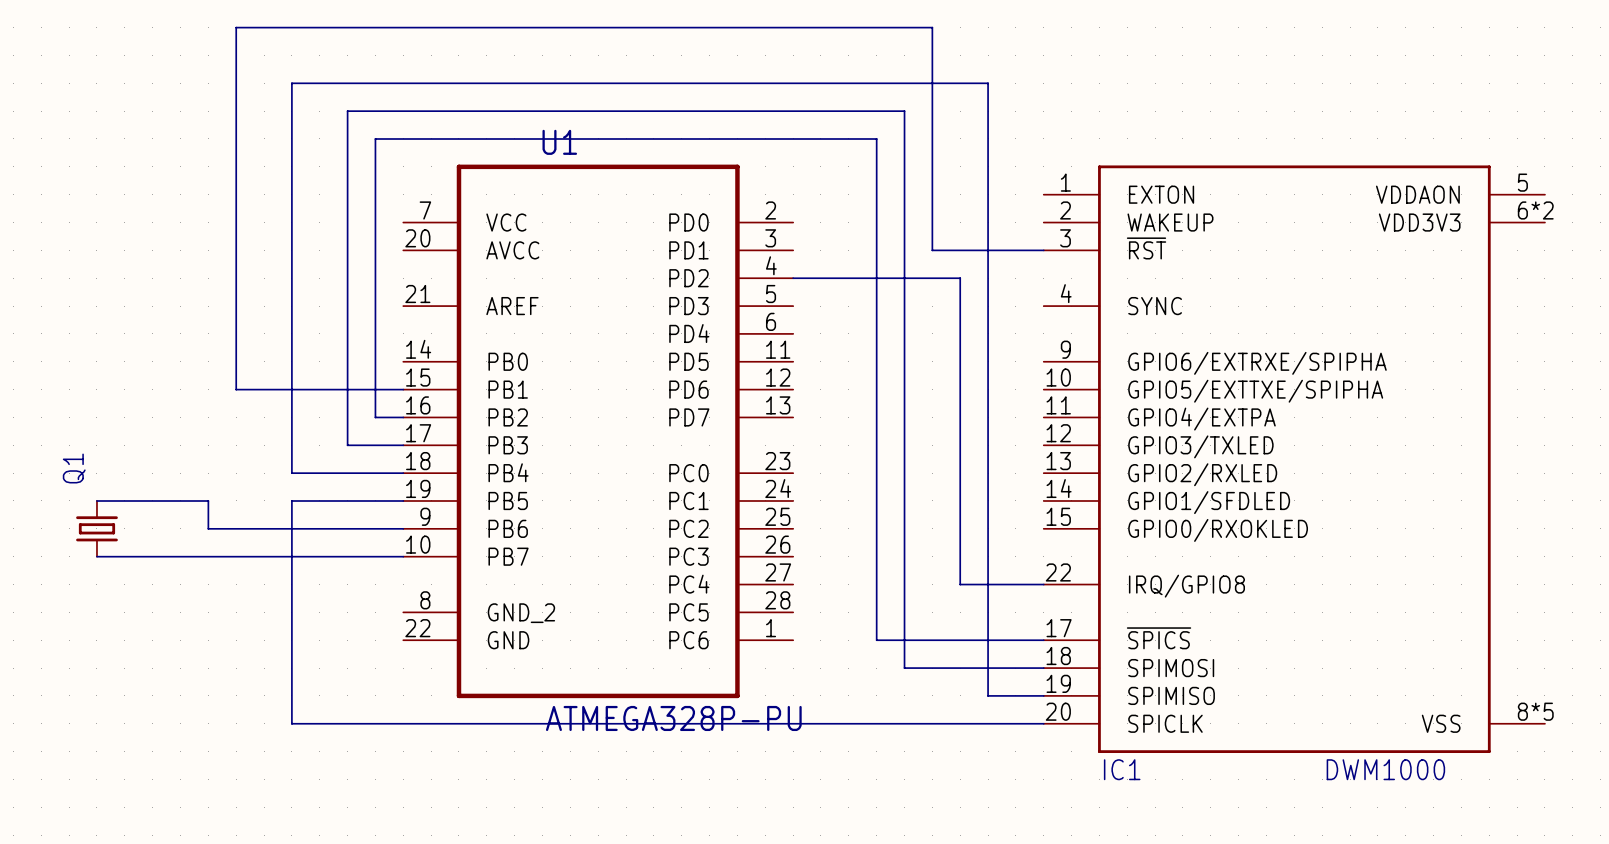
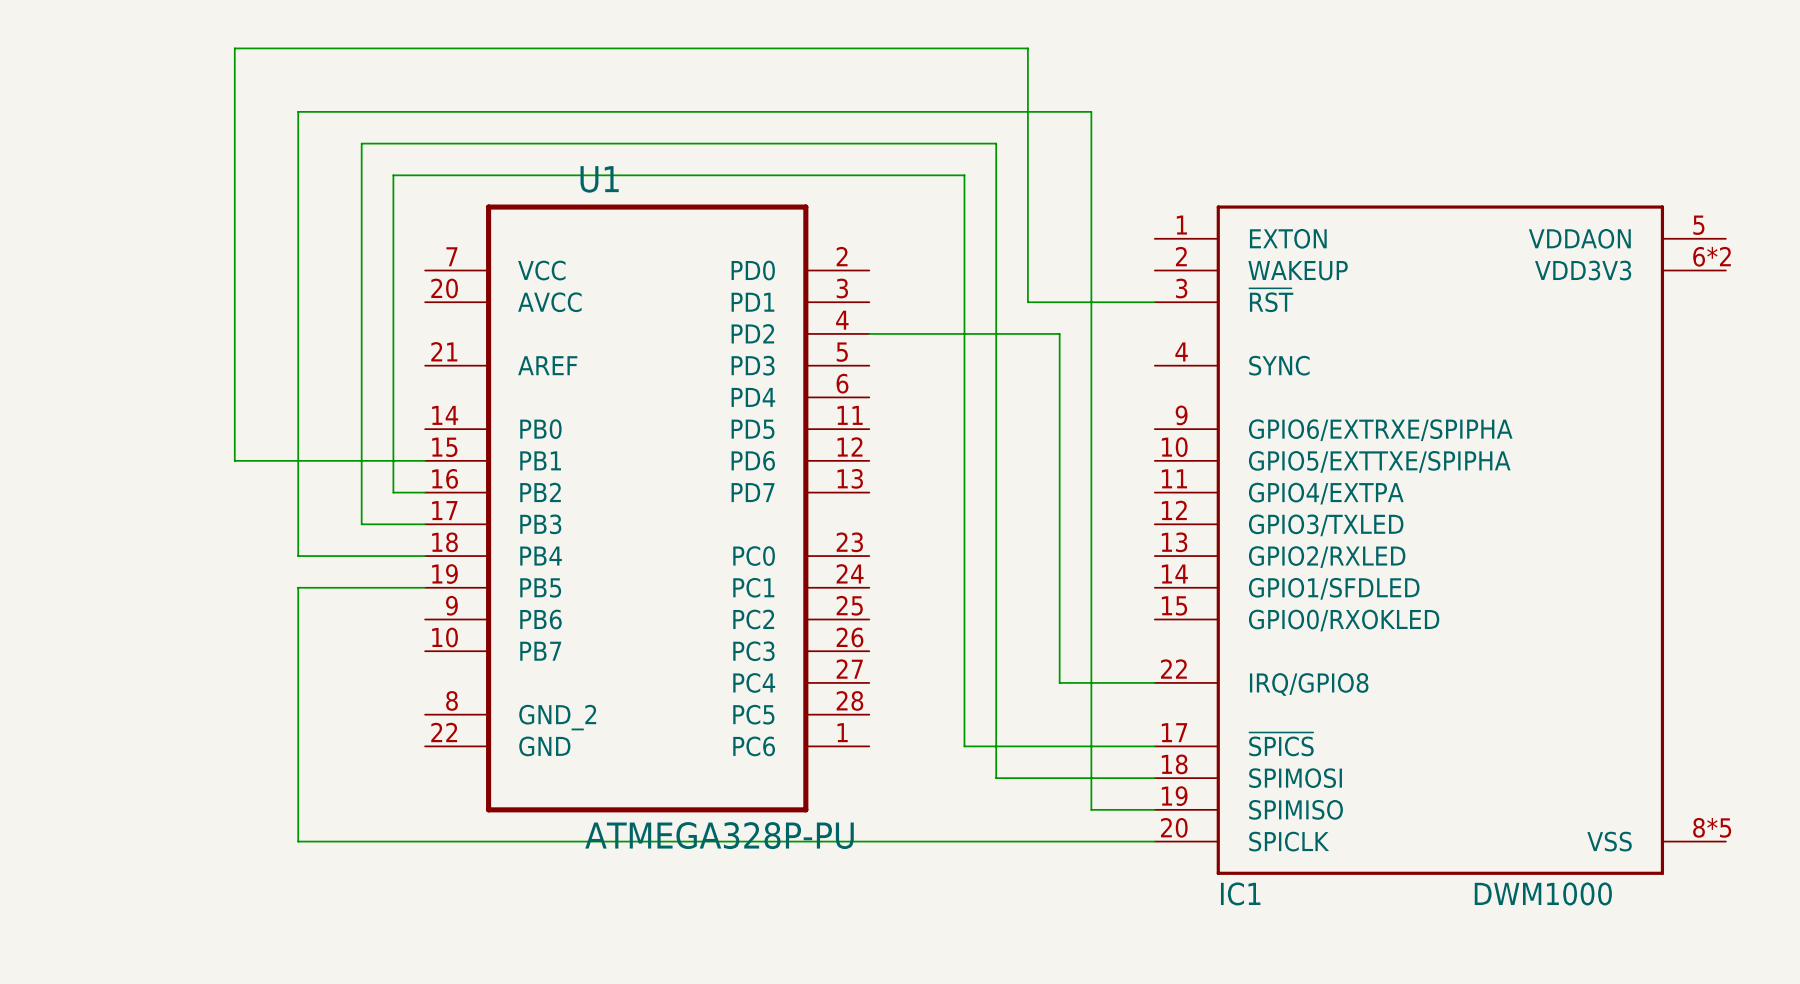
wire: (96, 500) (208, 500) (208, 528) (403, 528) -> none
Q1: (96, 528) -> none
wire: (96, 556) (403, 556) -> none

